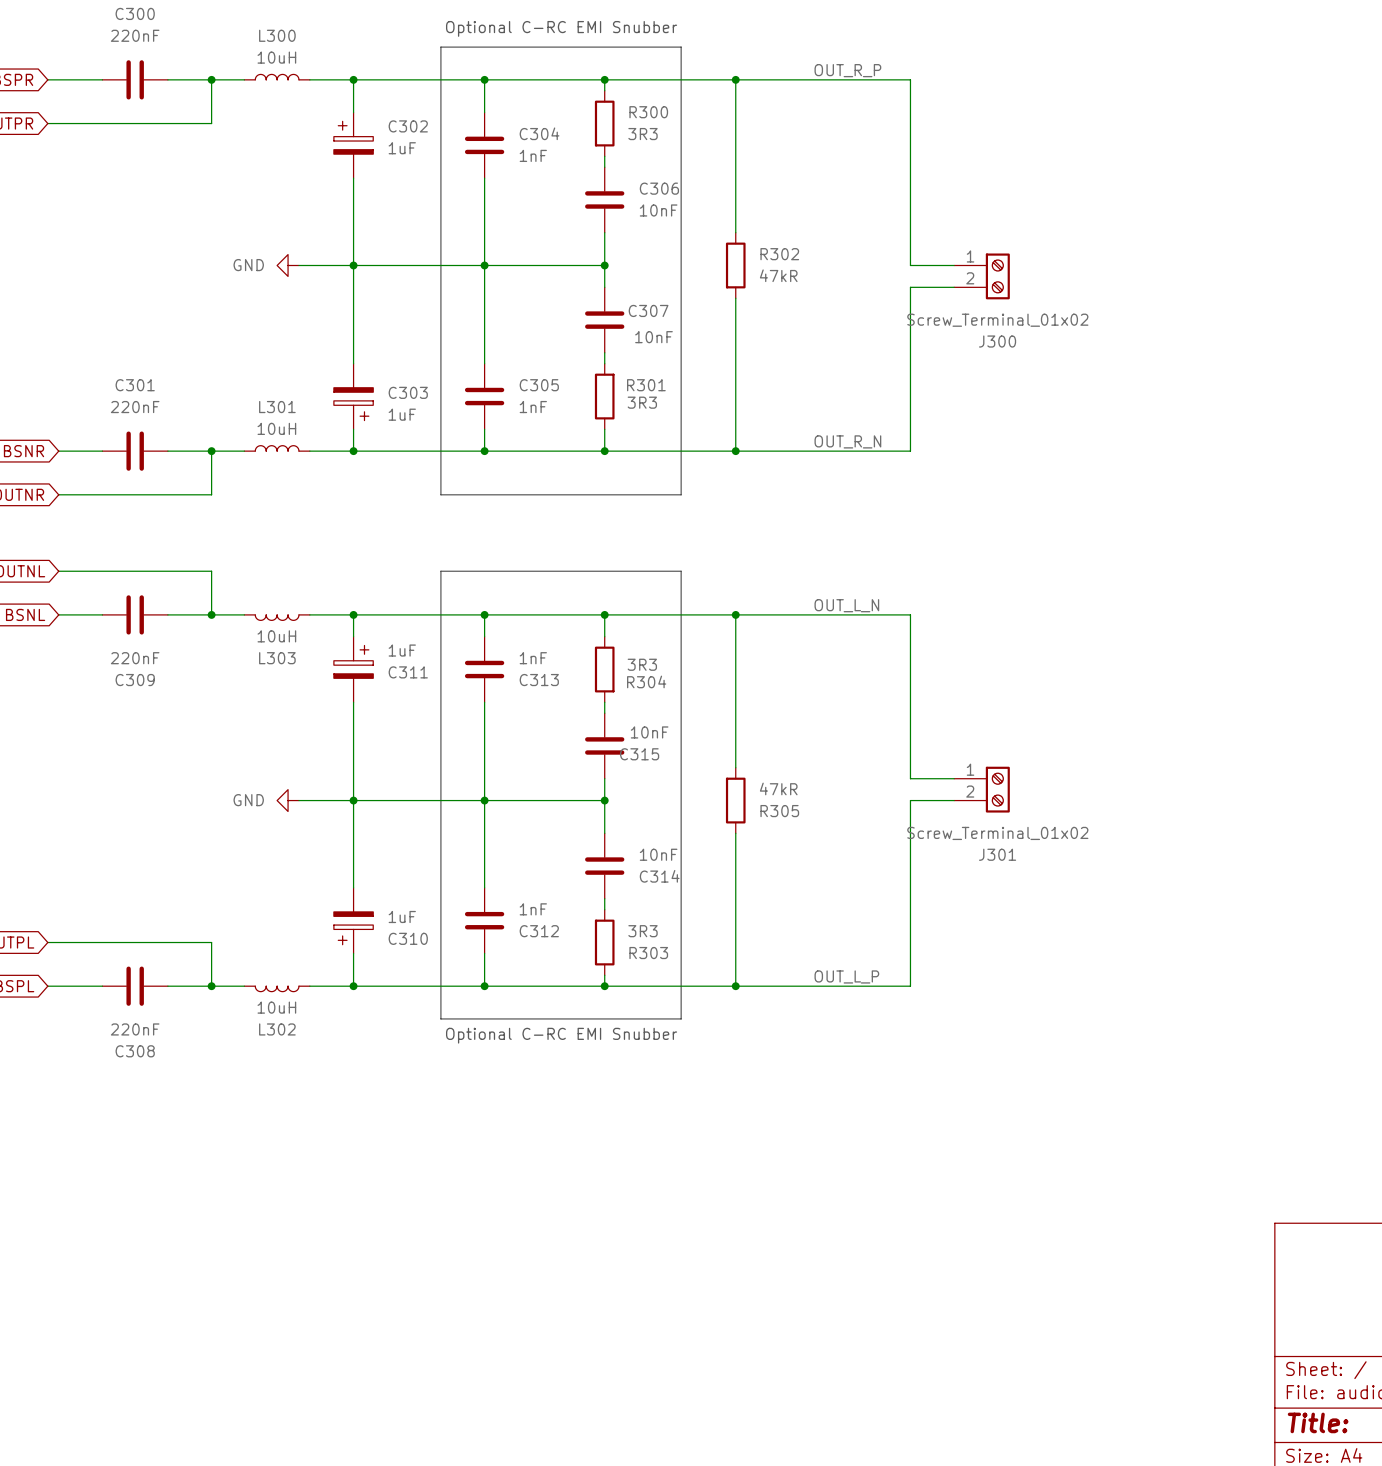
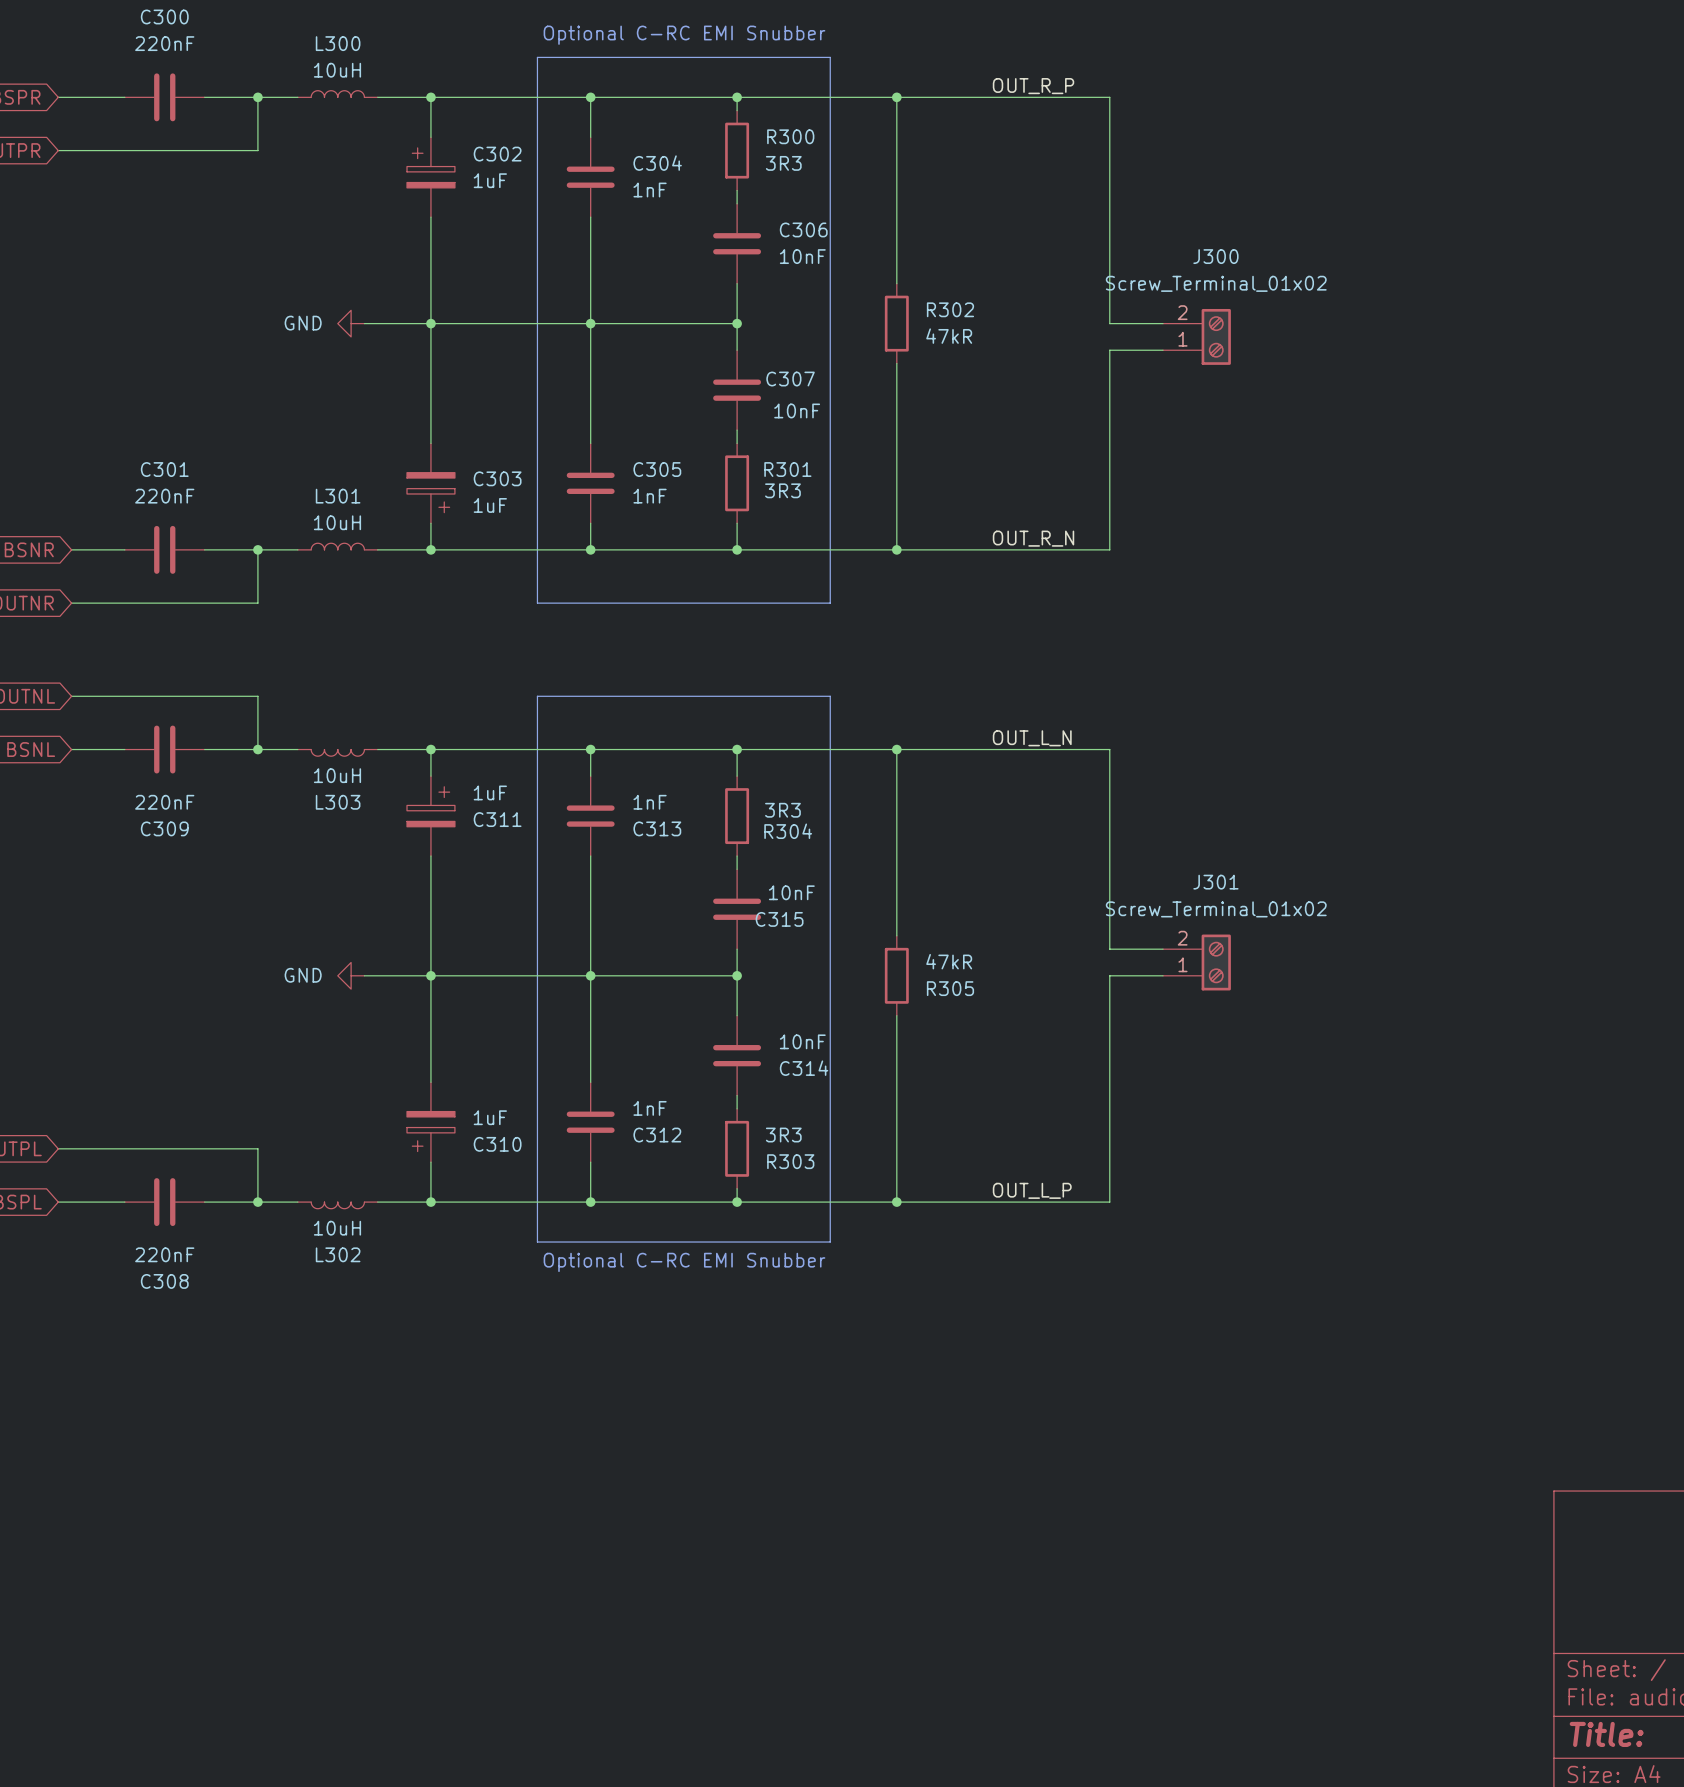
J300 flip: as is (997, 276) -> up-down (1216, 336)
J301 flip: as is (997, 789) -> up-down (1216, 962)

